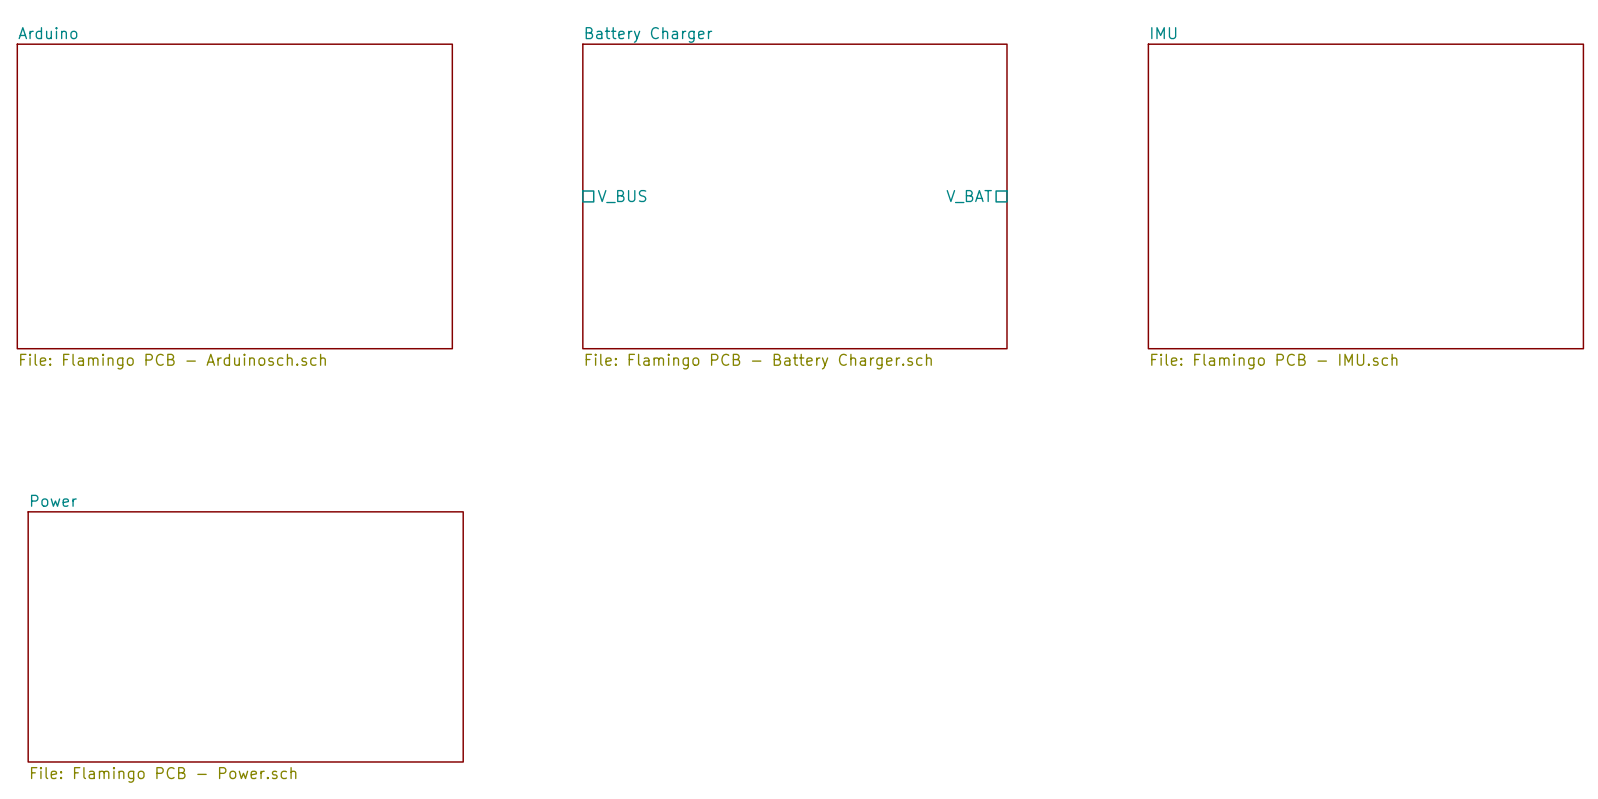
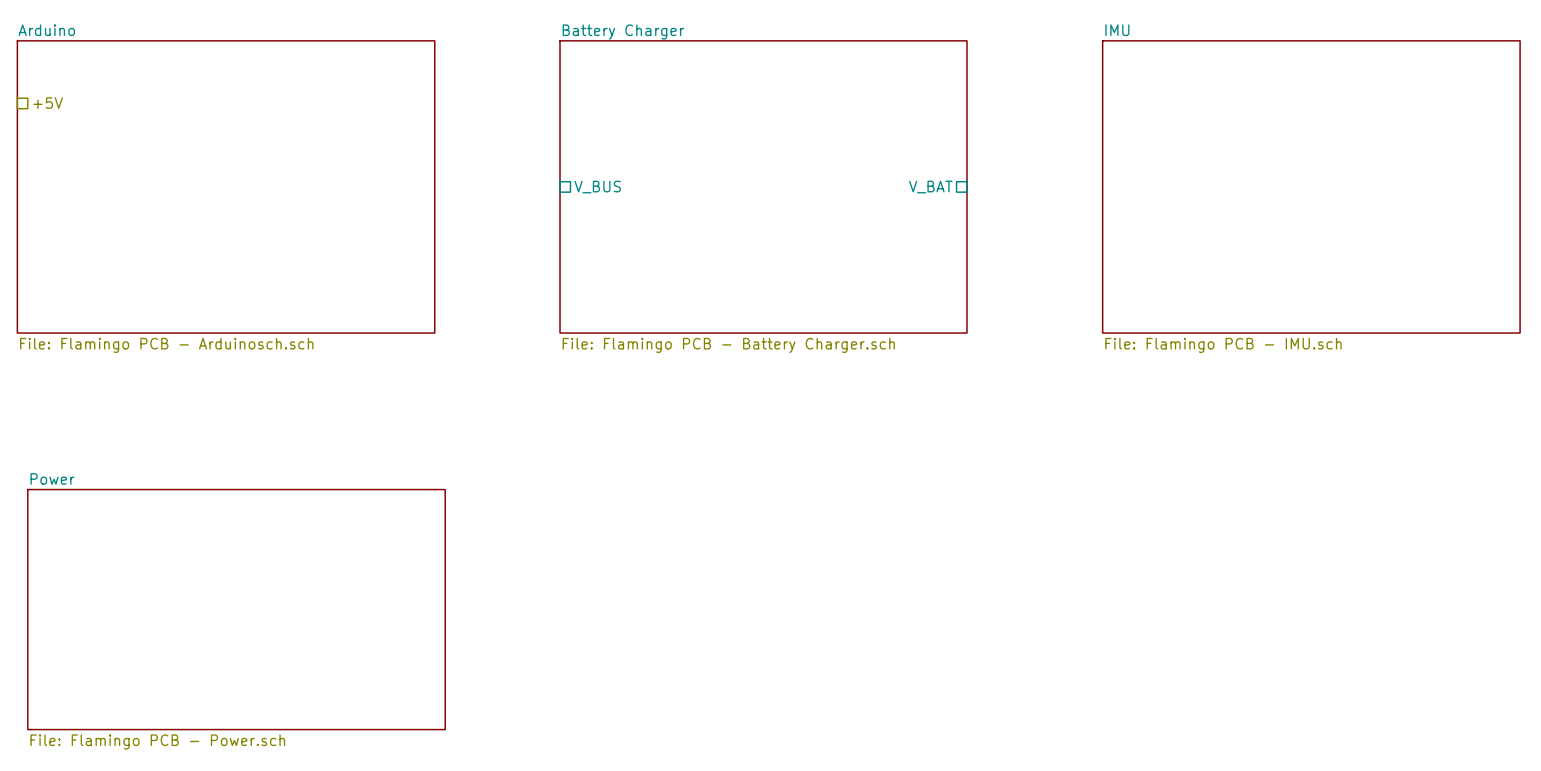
hierarchical label: none -> +5V (48, 103)

